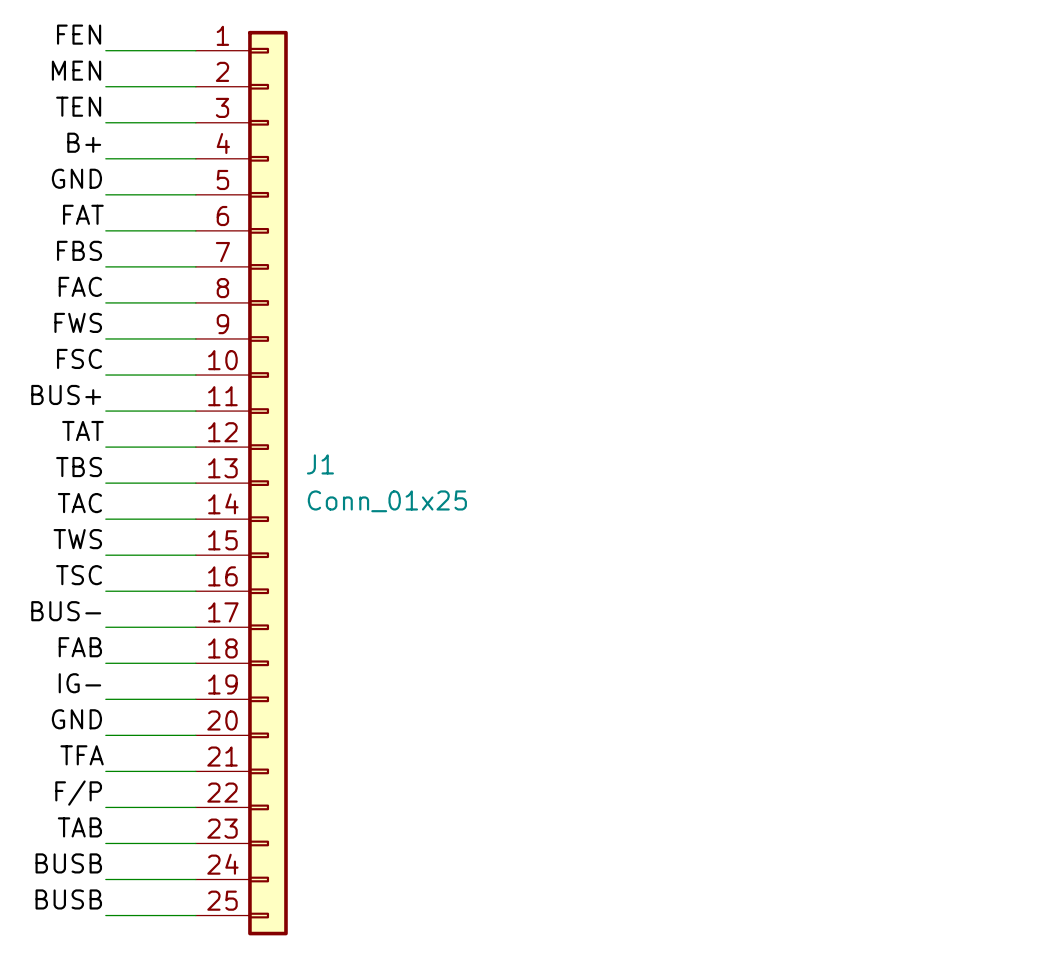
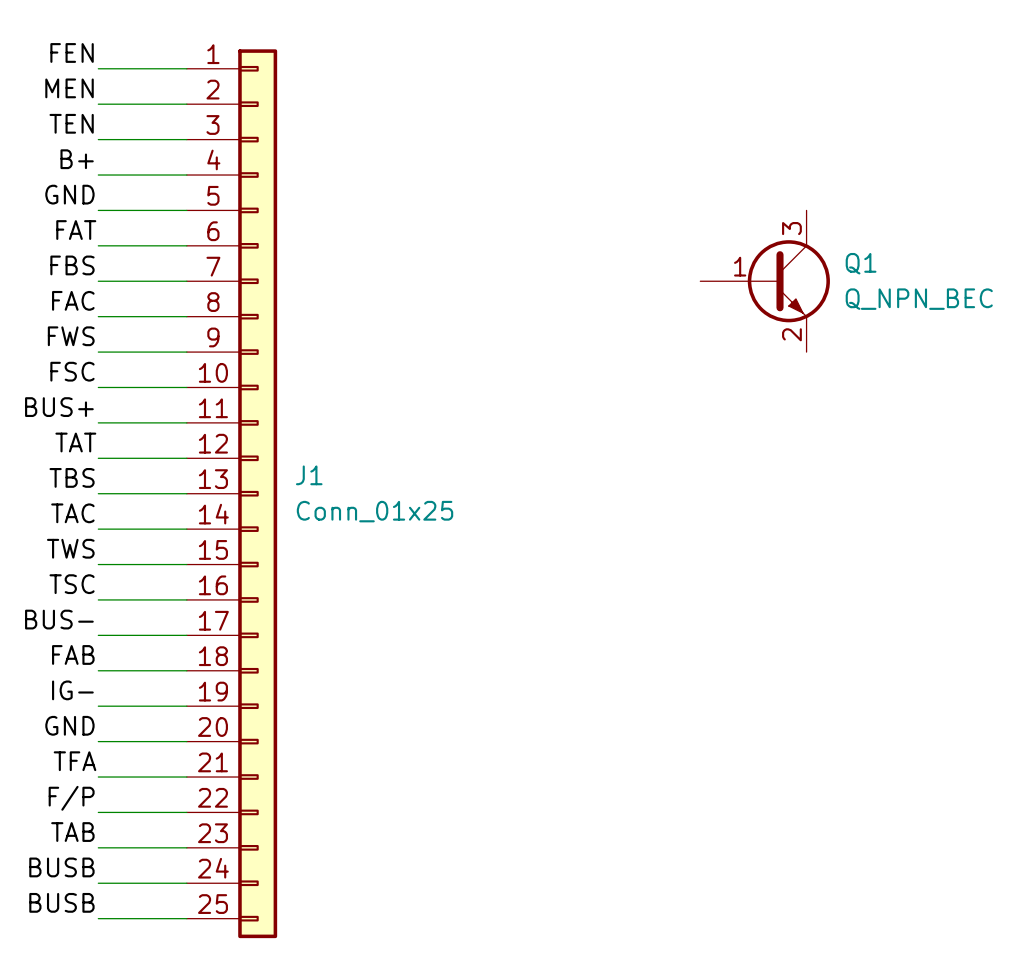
Q1: none -> Q_NPN_BEC (765, 281)

